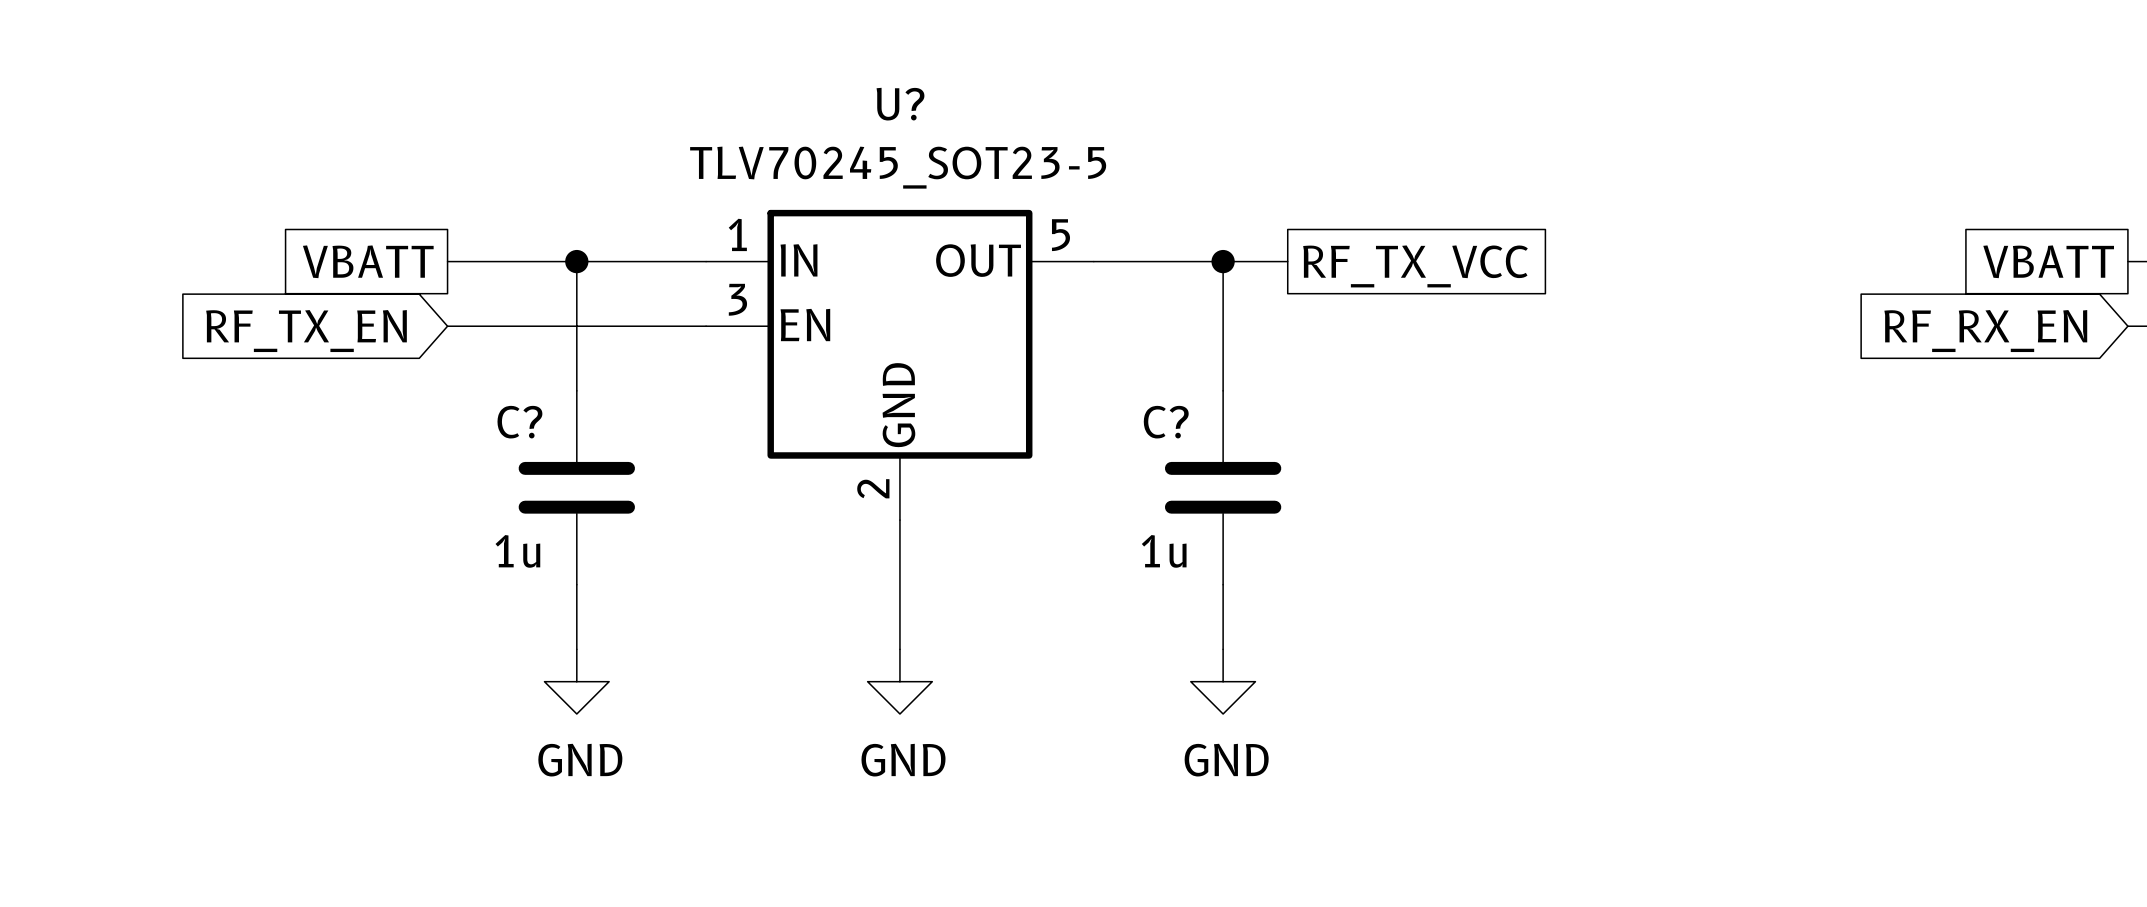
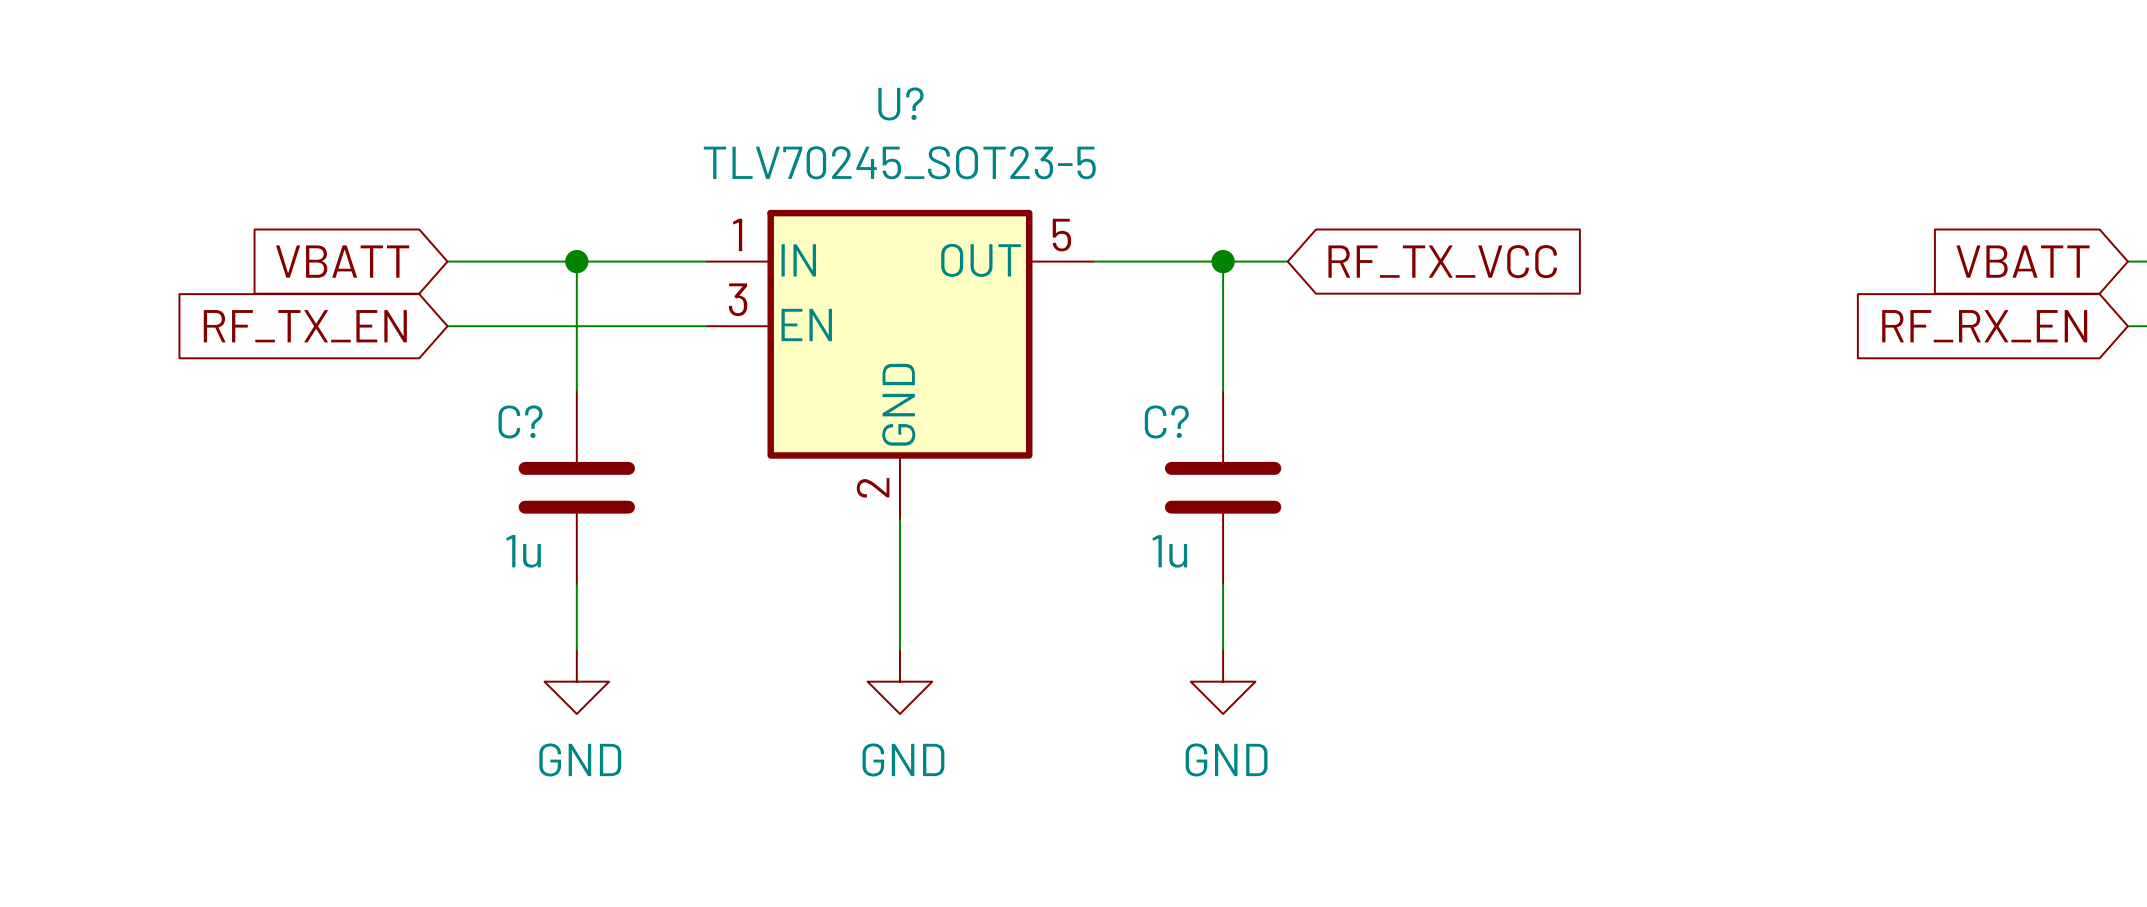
global label shape: passive (368, 261) -> input (342, 261)
global label shape: passive (2048, 261) -> input (2023, 261)
global label shape: passive (1415, 266) -> input (1442, 261)

